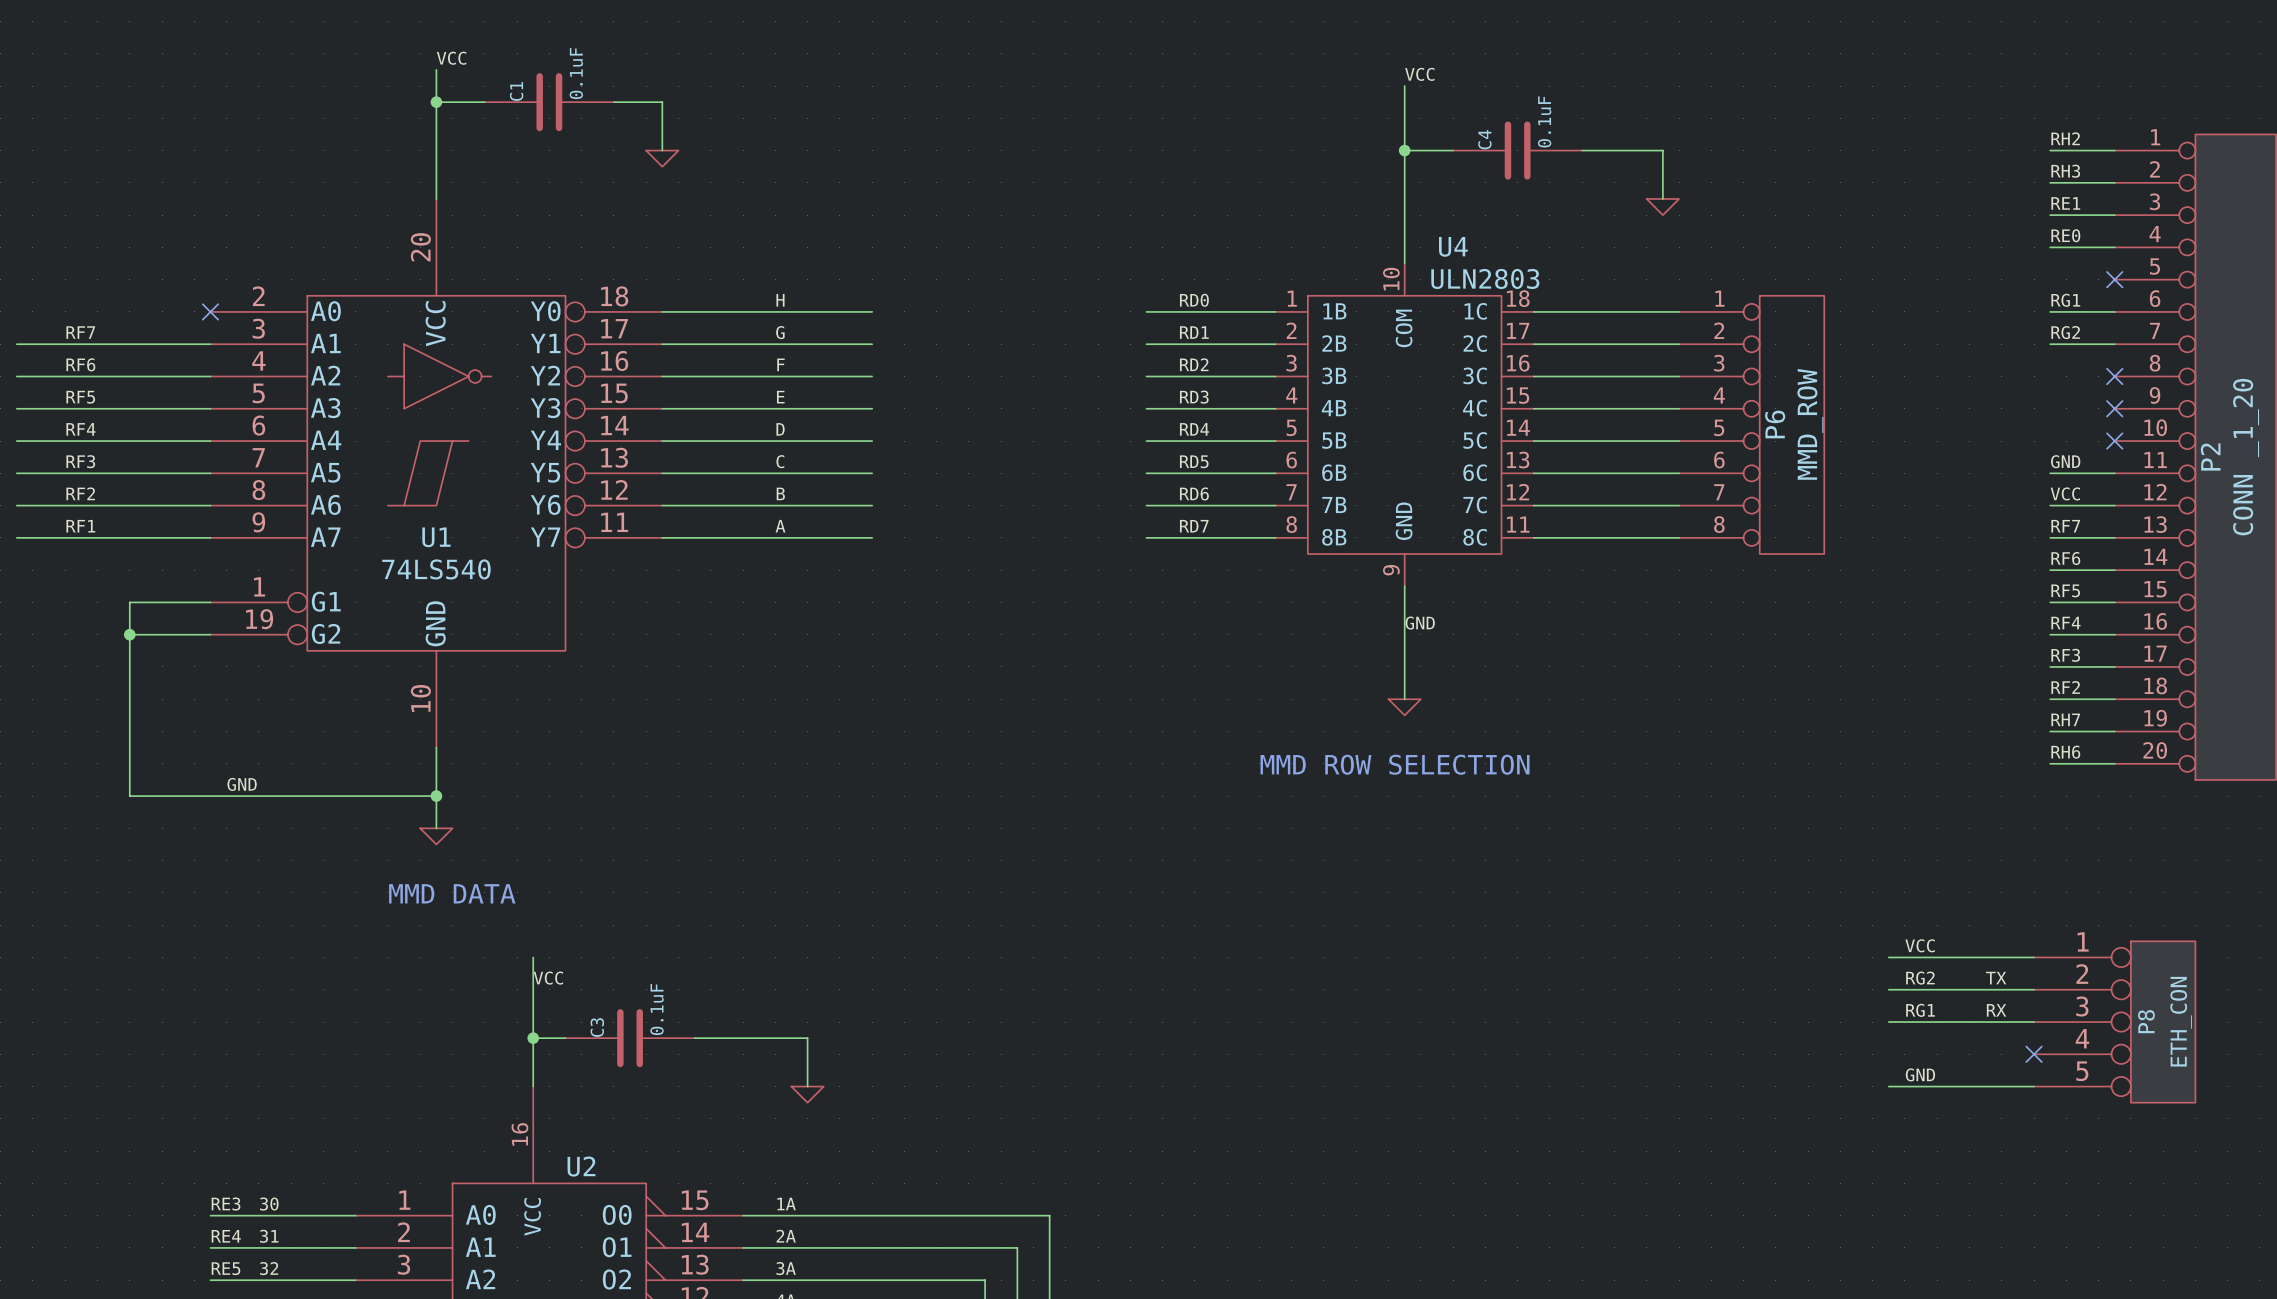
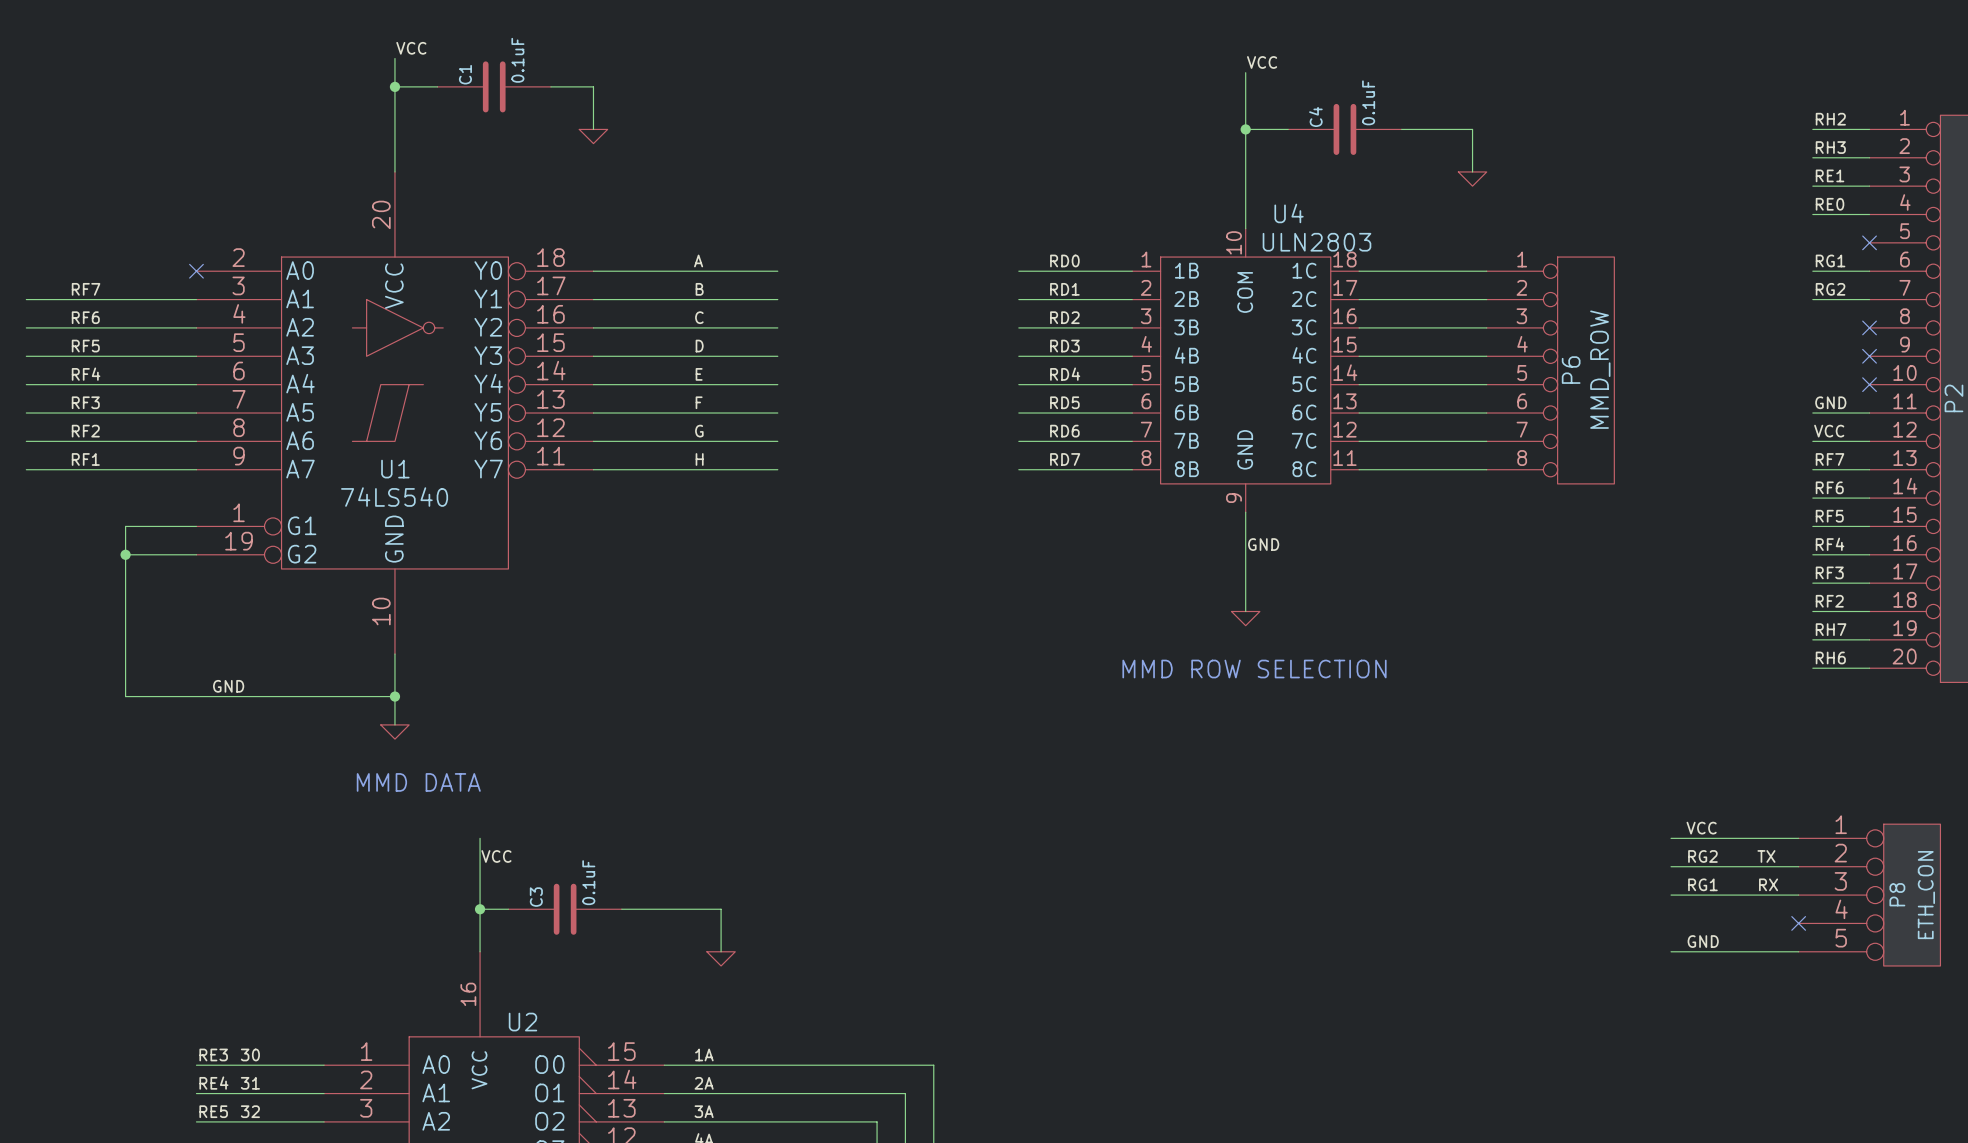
label: H (780, 300) -> A (698, 260)
label: G (780, 332) -> B (699, 289)
label: F (780, 364) -> C (699, 317)
label: E (780, 397) -> D (699, 346)
label: D (780, 429) -> E (699, 374)
label: C (780, 461) -> F (699, 402)
label: B (780, 493) -> G (699, 431)
label: A (780, 526) -> H (699, 459)

